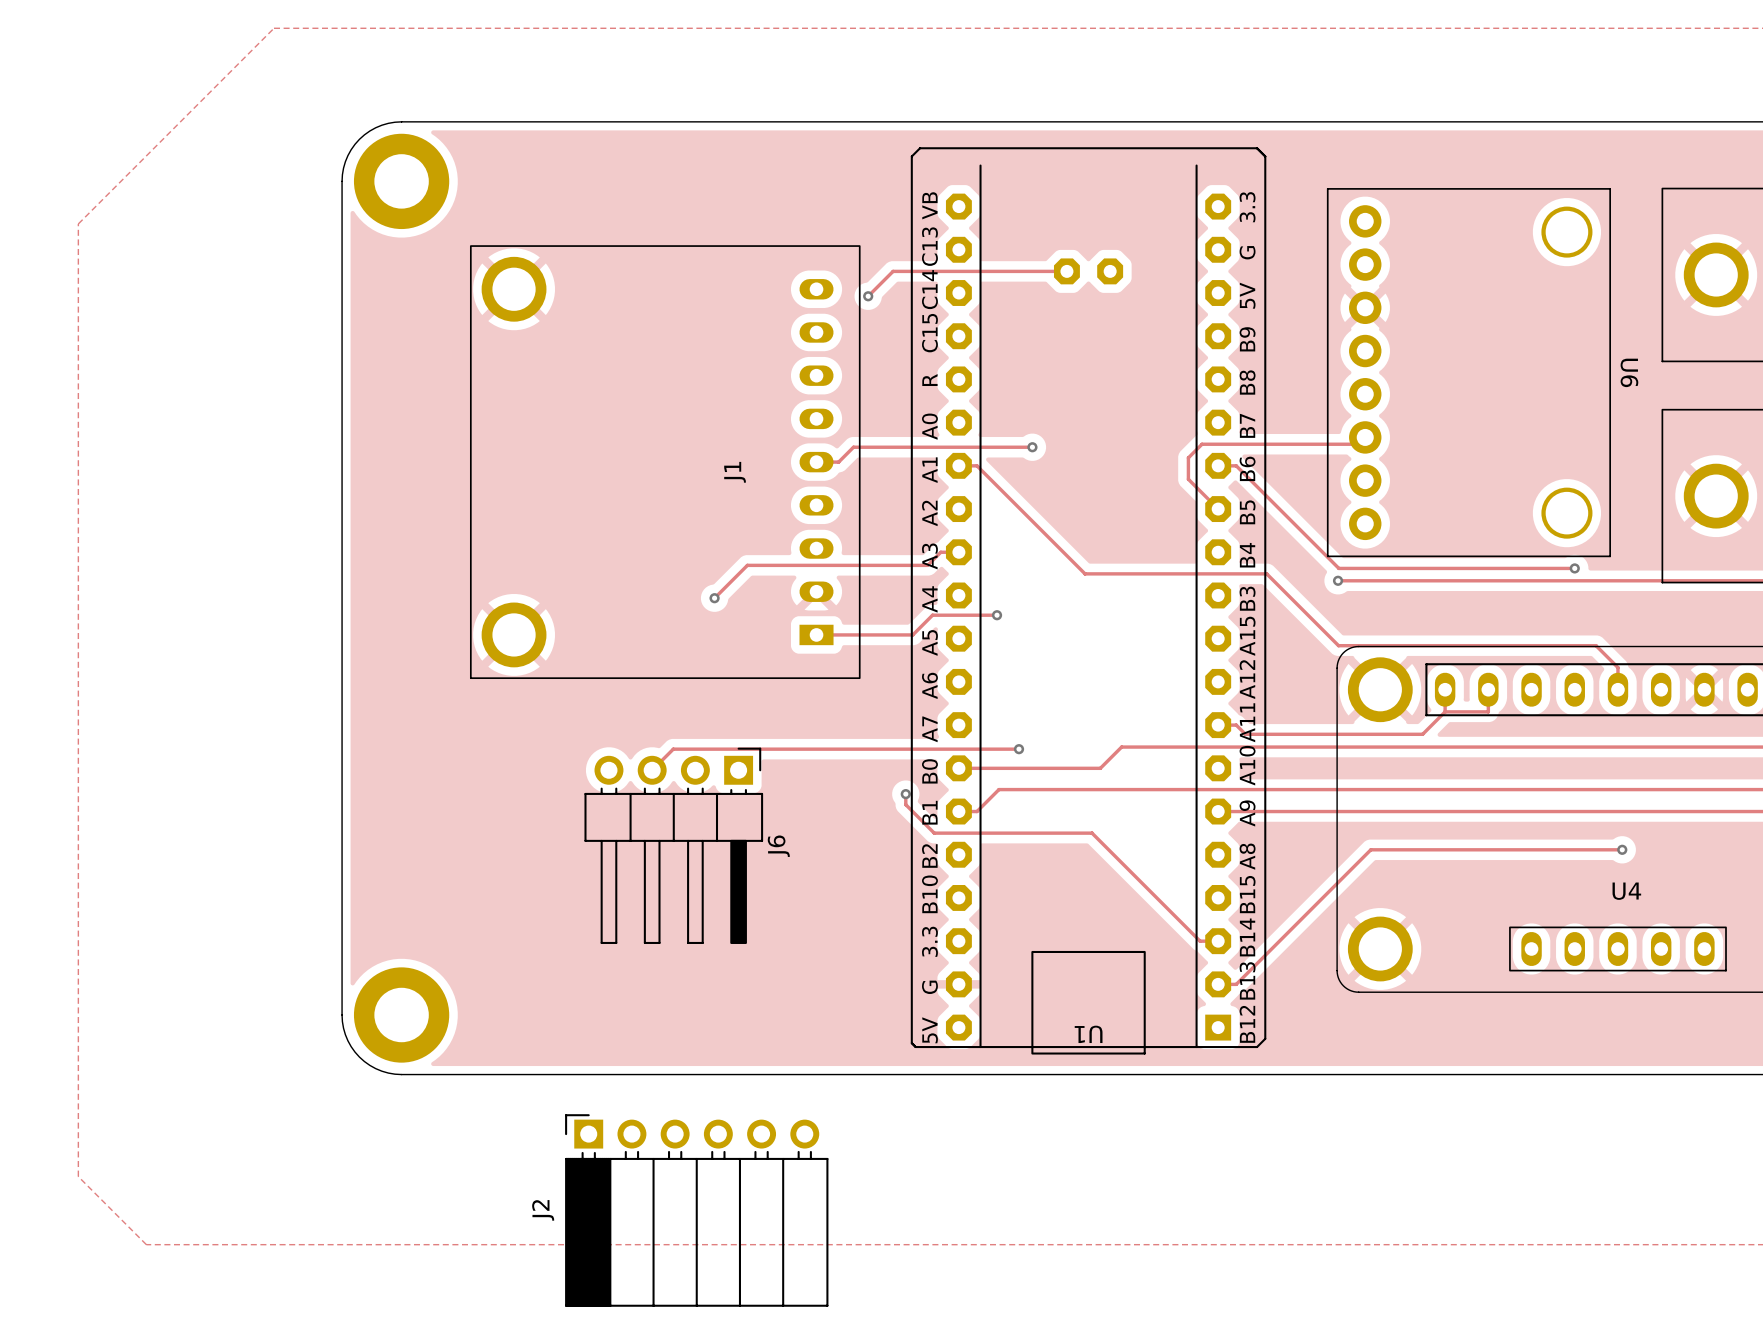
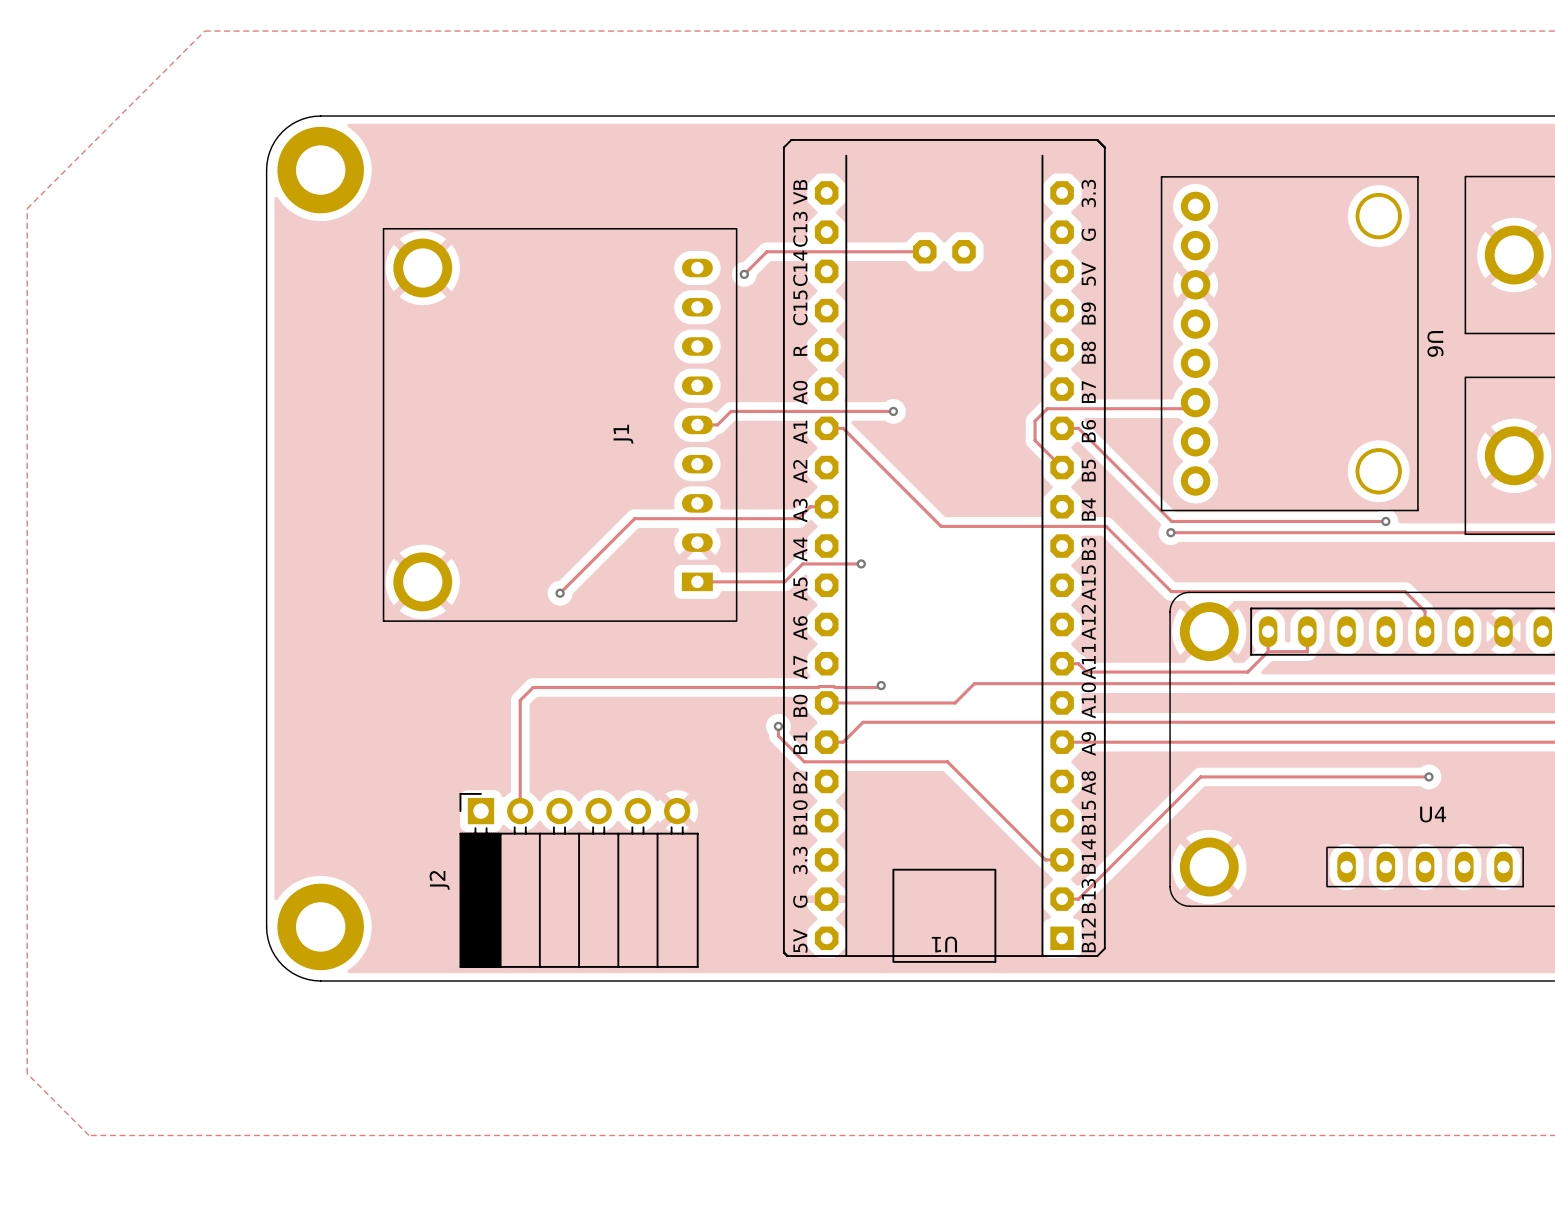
track: none -> (604, 548) (560, 593)
via position: (714, 598) -> (560, 593)
track: (1019, 749) (673, 749) (652, 770) -> (881, 685) (879, 687) (533, 687) (520, 700) (520, 811) (522, 818)
J6: (673, 845) -> none
J2 position: (696, 1210) -> (579, 880)

